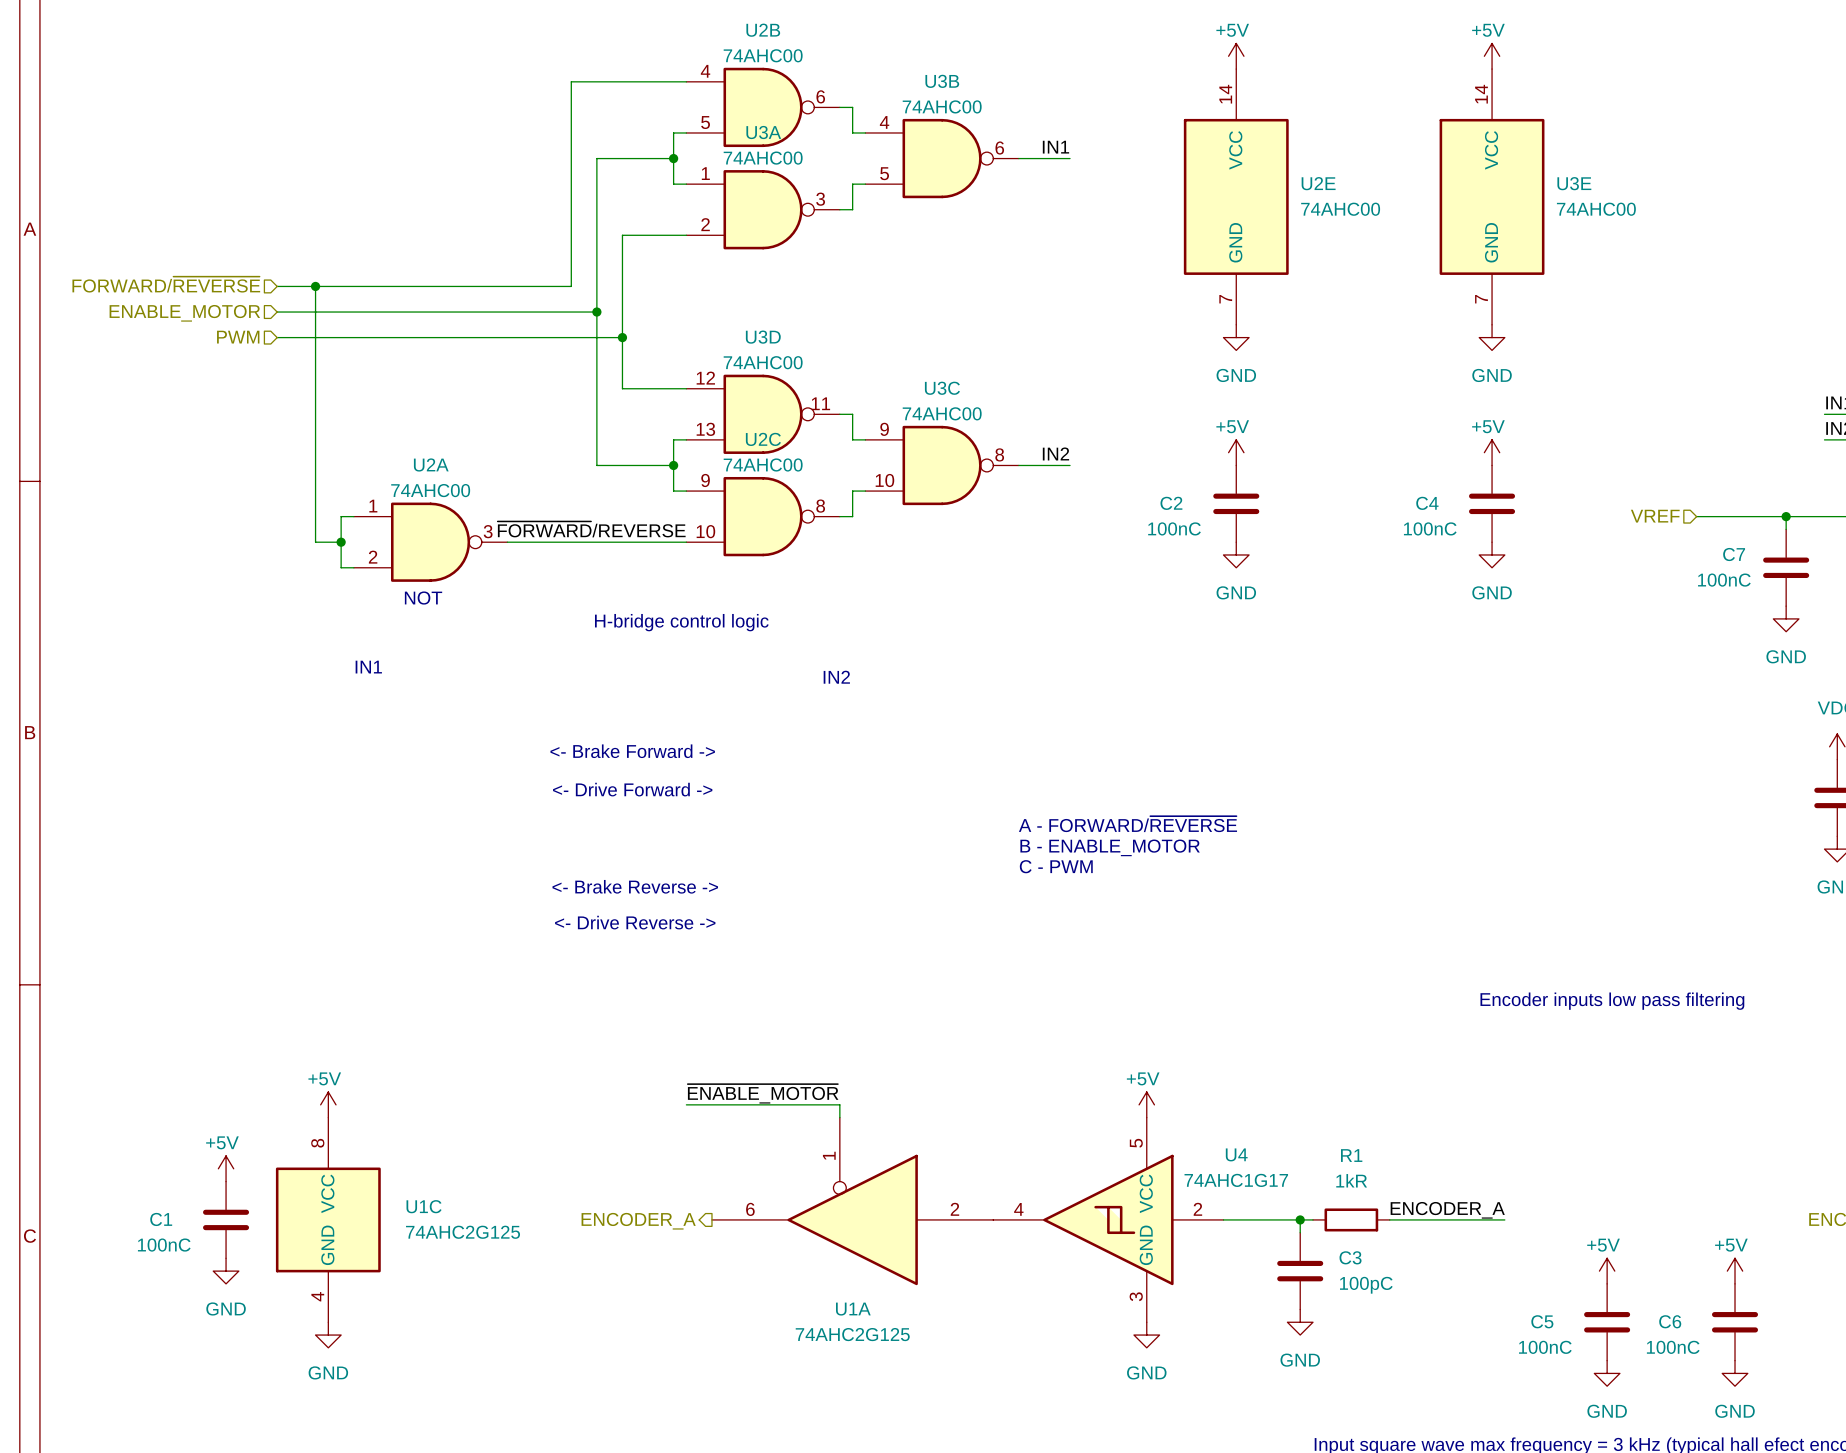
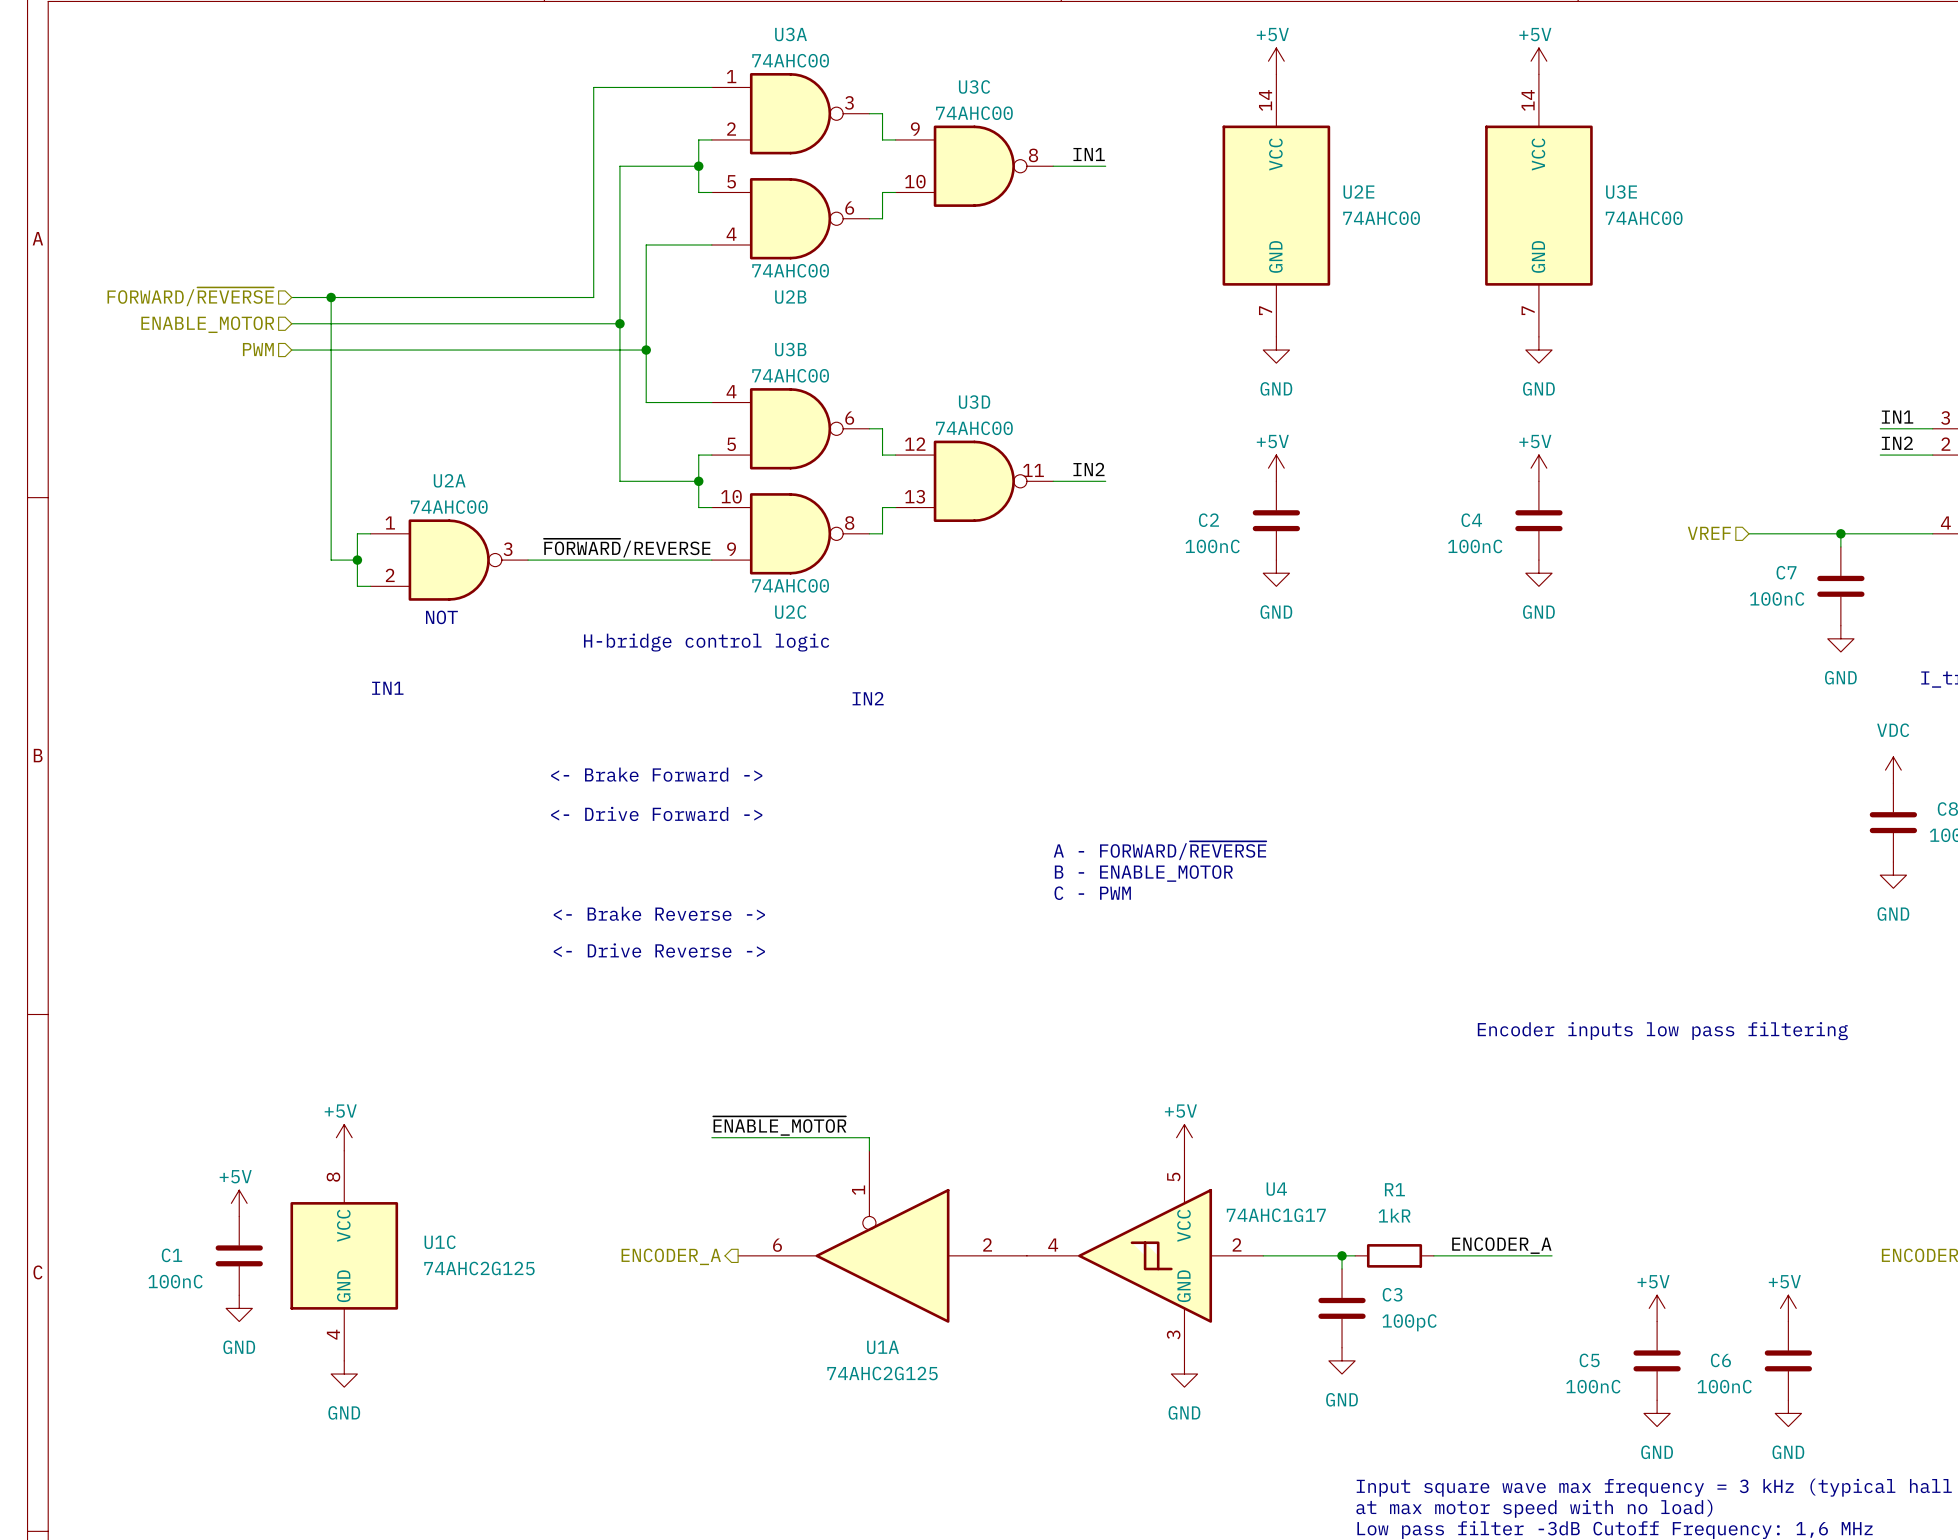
U2B flip: as is (763, 107) -> up-down (790, 218)
U2B position: (763, 107) -> (790, 218)
U3B position: (942, 158) -> (790, 428)
U3A position: (763, 209) -> (790, 113)
U3D position: (763, 414) -> (974, 481)
U3C position: (942, 465) -> (974, 166)
U2C flip: as is (763, 516) -> up-down (790, 533)

